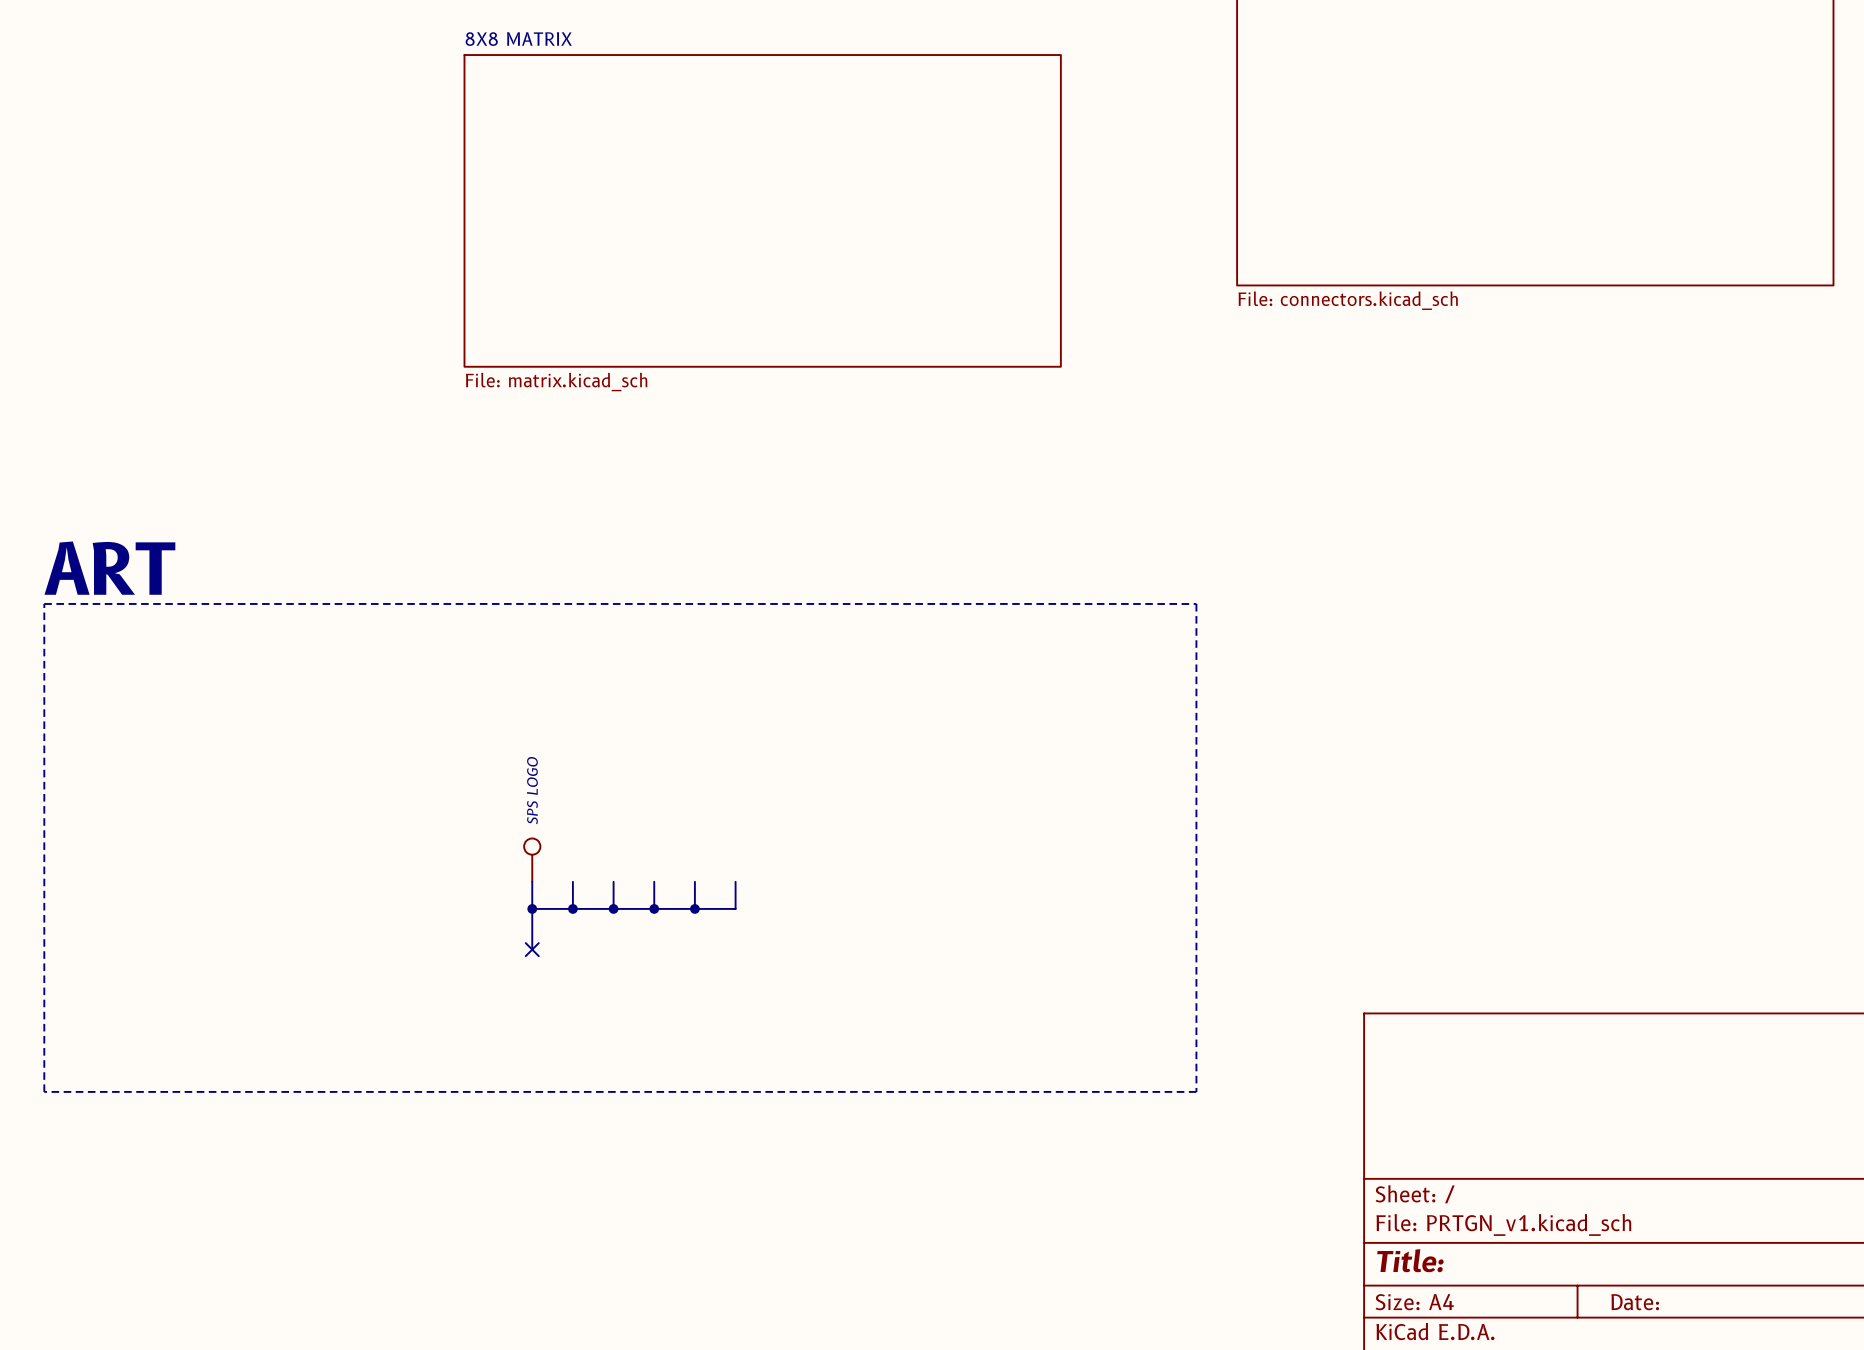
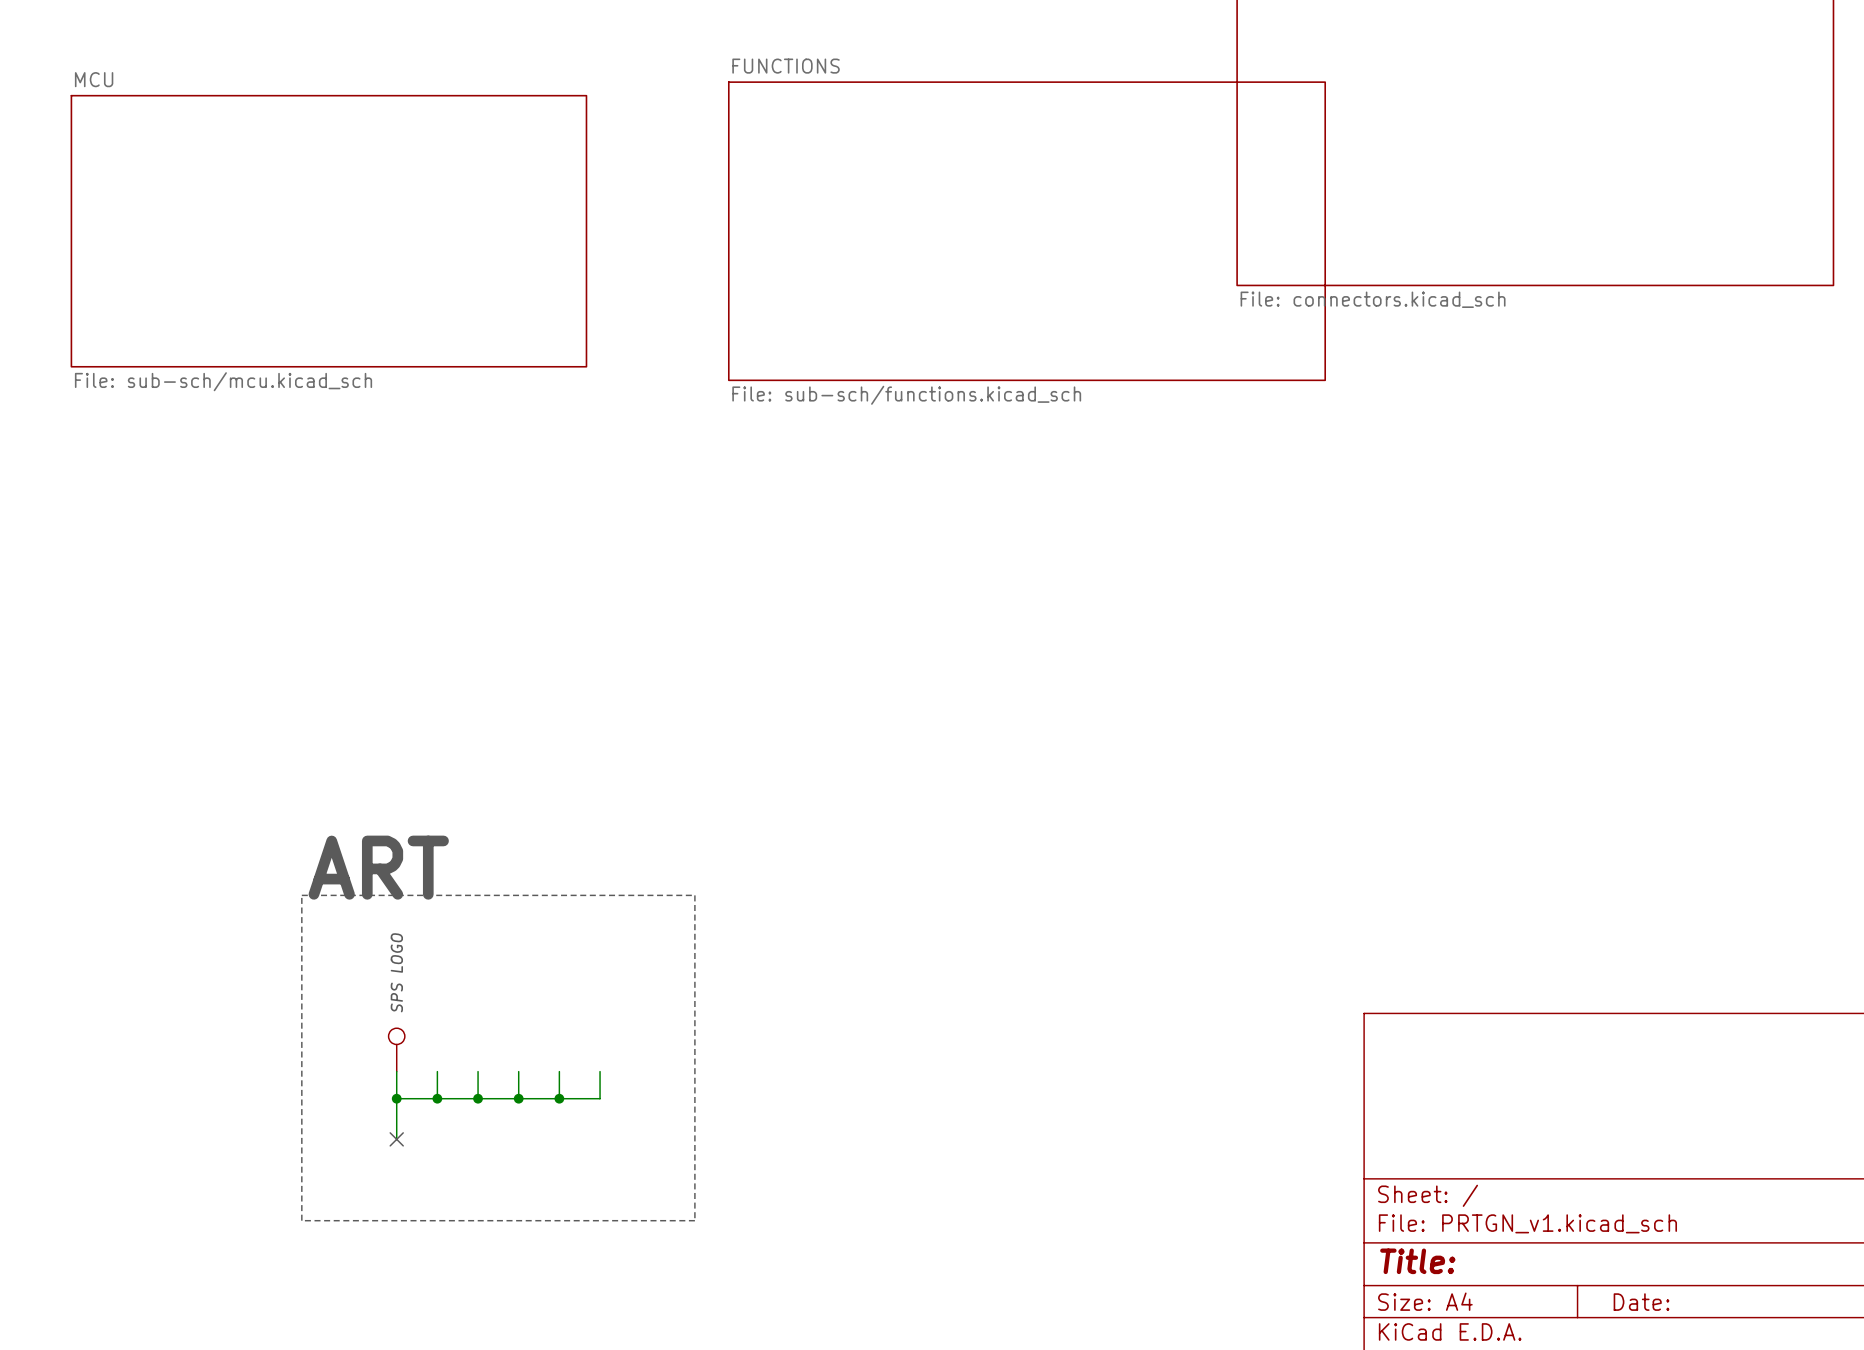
sheet 8X8 MATRIX: File: matrix.kicad_sch (762, 210) -> none
sheet MCU: none -> File: sub-sch/mcu.kicad_sch (328, 231)
sheet FUNCTIONS: none -> File: sub-sch/functions.kicad_sch (1026, 231)
text: ART (109, 568) -> none
line: (44, 603) (1196, 603) (1196, 1091) (44, 1091) (44, 603) -> none
text position: SPS LOGO (532, 790) -> SPS LOGO (396, 972)
part position: (532, 860) -> (396, 1049)
text: none -> ART (378, 867)
wire: (532, 881) (532, 949) -> (396, 1071) (396, 1139)
wire: (572, 881) (572, 908) -> (437, 1071) (437, 1098)
wire: (613, 881) (613, 908) -> (478, 1071) (478, 1098)
wire: (654, 881) (654, 908) -> (518, 1071) (518, 1098)
wire: (694, 881) (694, 908) -> (559, 1071) (559, 1098)
wire: (735, 881) (735, 908) (532, 908) -> (600, 1071) (600, 1098) (396, 1098)
line: none -> (301, 895) (694, 895) (694, 1220) (301, 1220) (301, 895)
junction: (532, 908) -> none
junction: (572, 908) -> none
junction: (613, 908) -> none
junction: (654, 908) -> none
junction: (694, 908) -> none
no-connect mark: (532, 949) -> none
junction: none -> (396, 1098)
junction: none -> (437, 1098)
junction: none -> (478, 1098)
junction: none -> (518, 1098)
junction: none -> (559, 1098)
no-connect mark: none -> (396, 1139)

